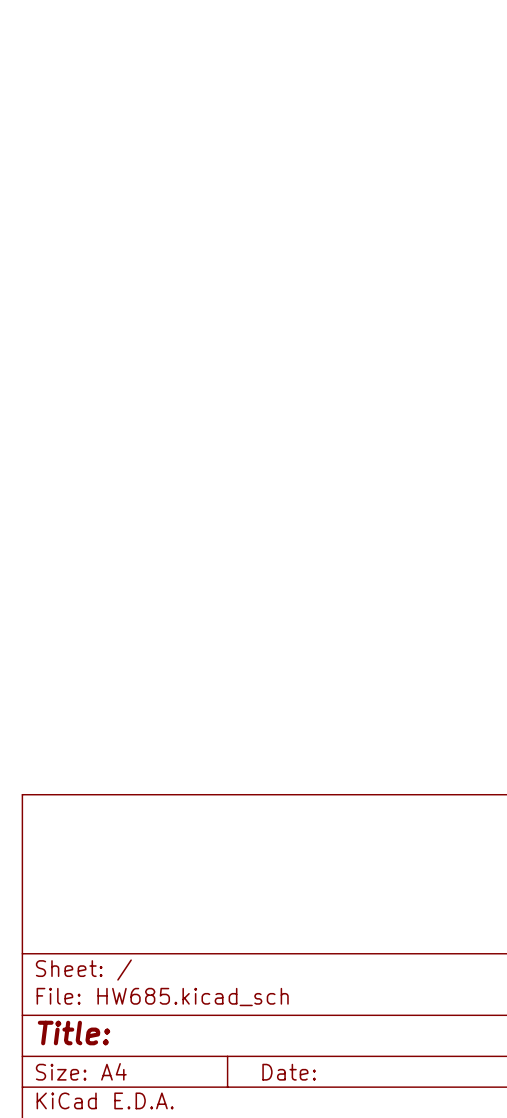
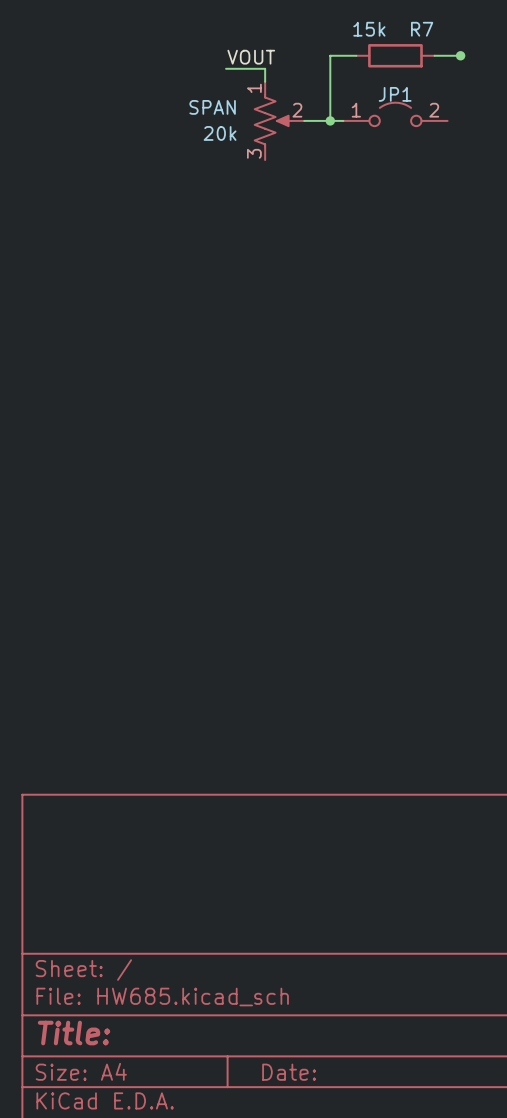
wire: none -> (356, 55) (330, 55) (330, 120)
R7: none -> 15k (395, 55)
wire: none -> (434, 55) (460, 55)
junction: none -> (460, 55)
label: none -> VOUT (251, 57)
wire: none -> (226, 68) (265, 68) (265, 81)
JP1: none -> (395, 114)
SPAN: none -> 20k (279, 120)
wire: none -> (304, 120) (343, 120)
junction: none -> (330, 120)

